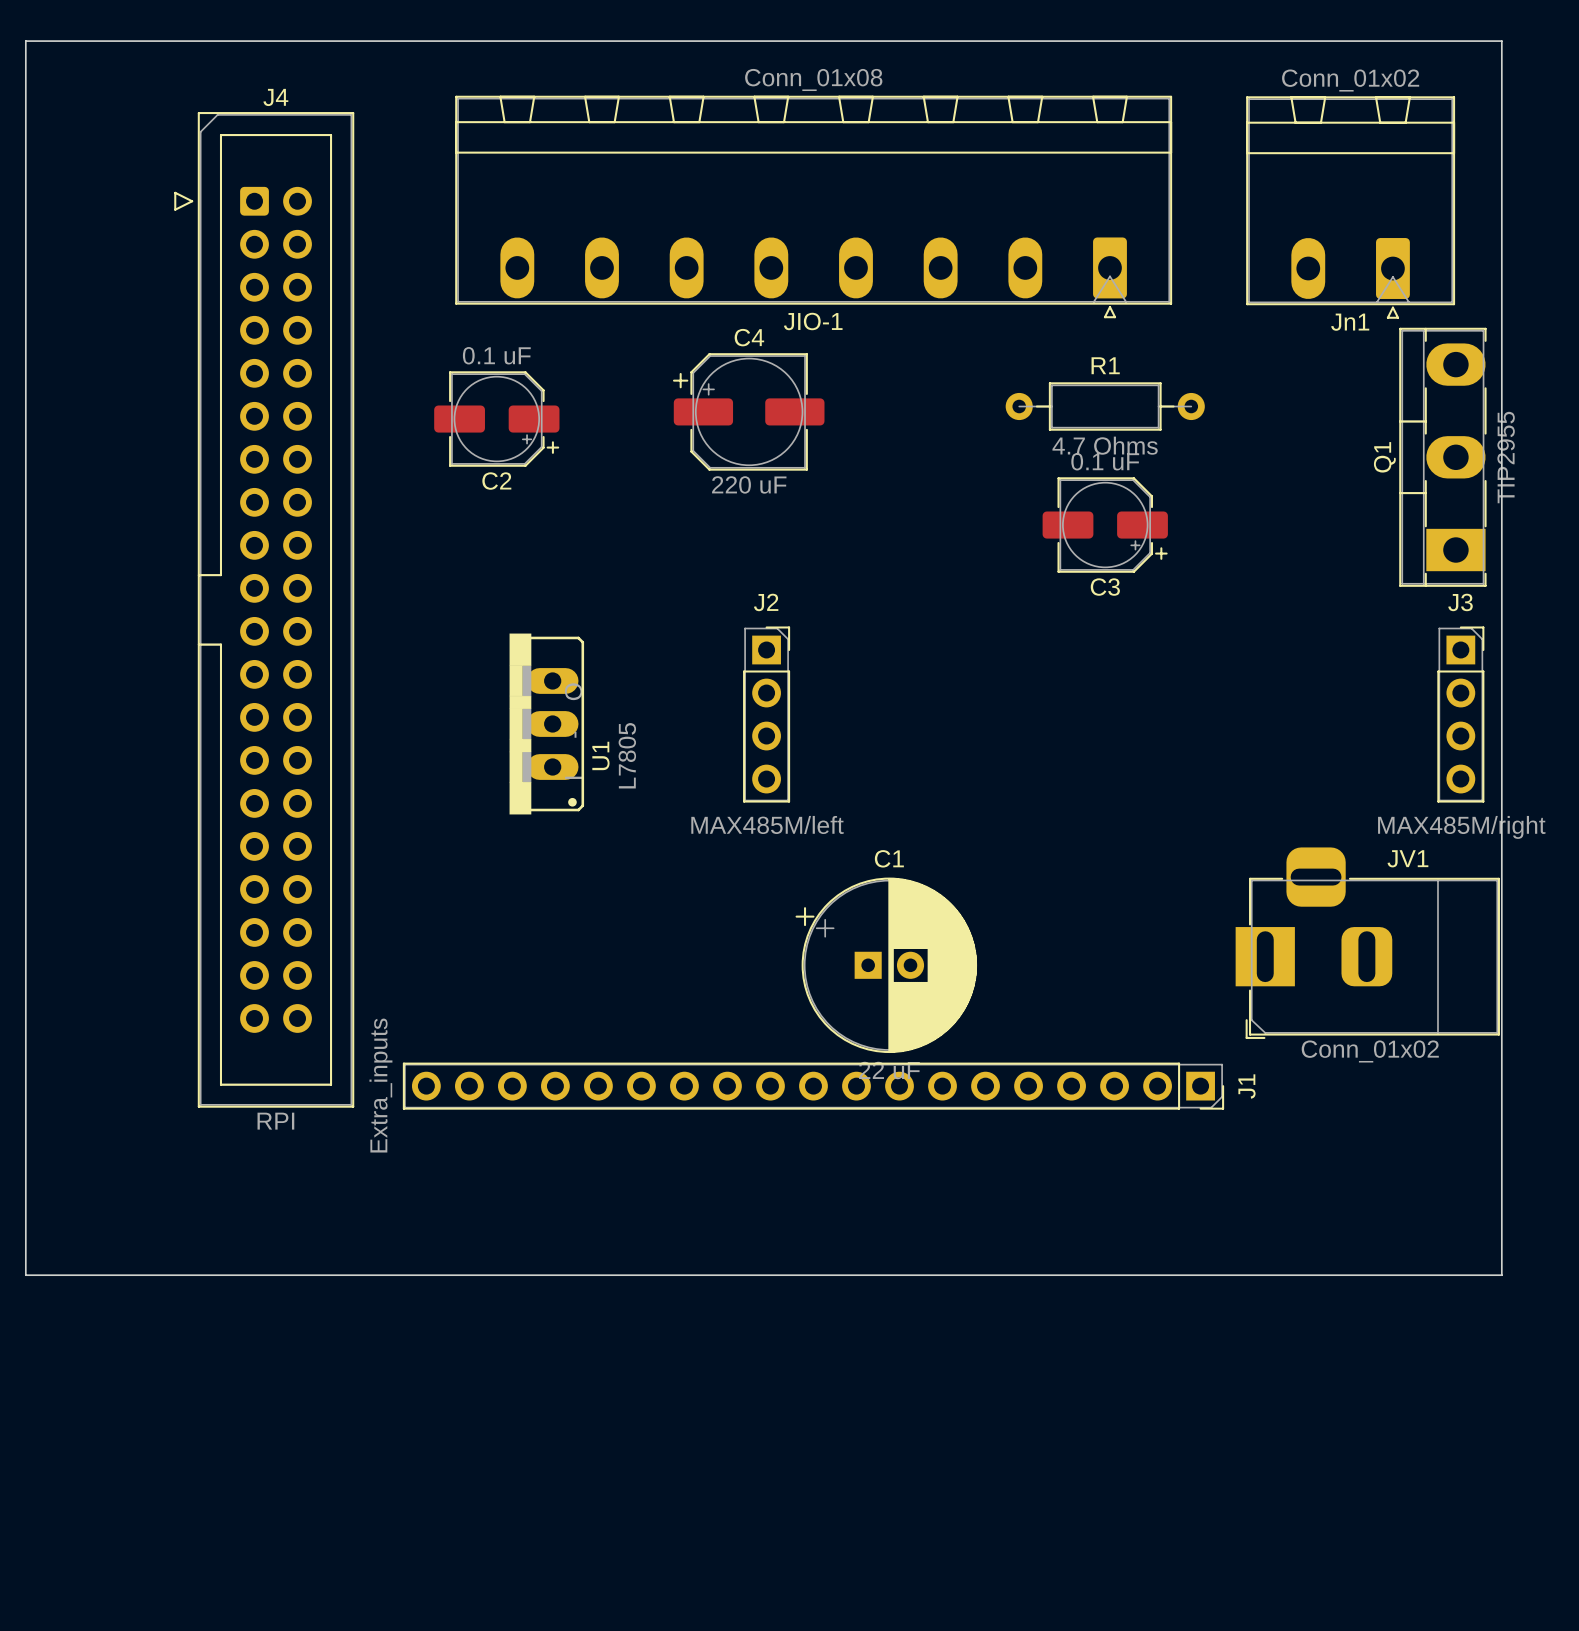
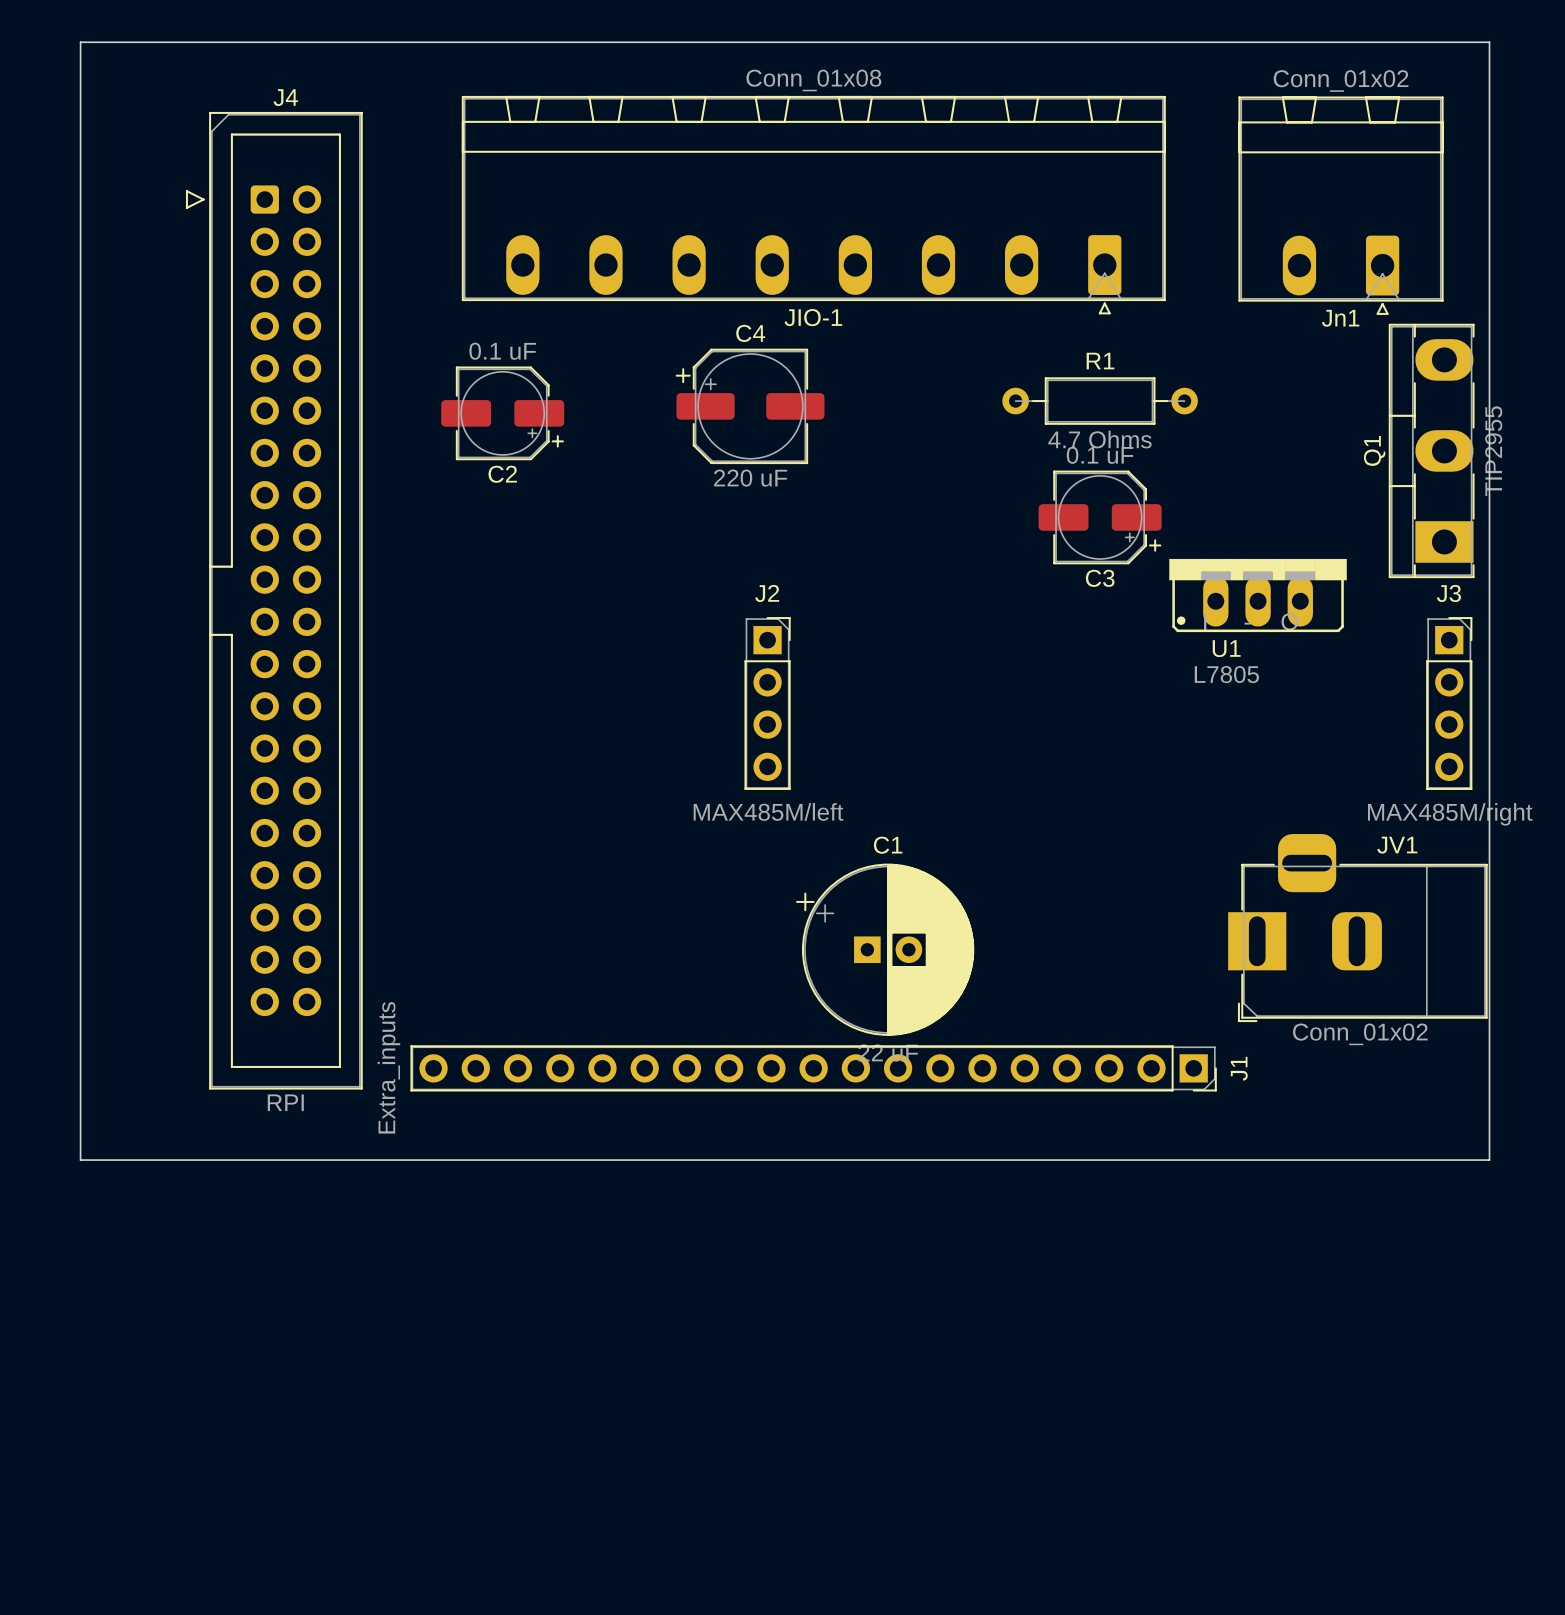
board edge: (66, 41) (25, 41) (25, 1275) (1501, 1275) (1501, 1179) -> (80, 42) (80, 1160) (1489, 1160)
U1 rotation: 0° (546, 724) -> 90° clockwise (1258, 595)
U1 position: (546, 724) -> (1258, 595)

